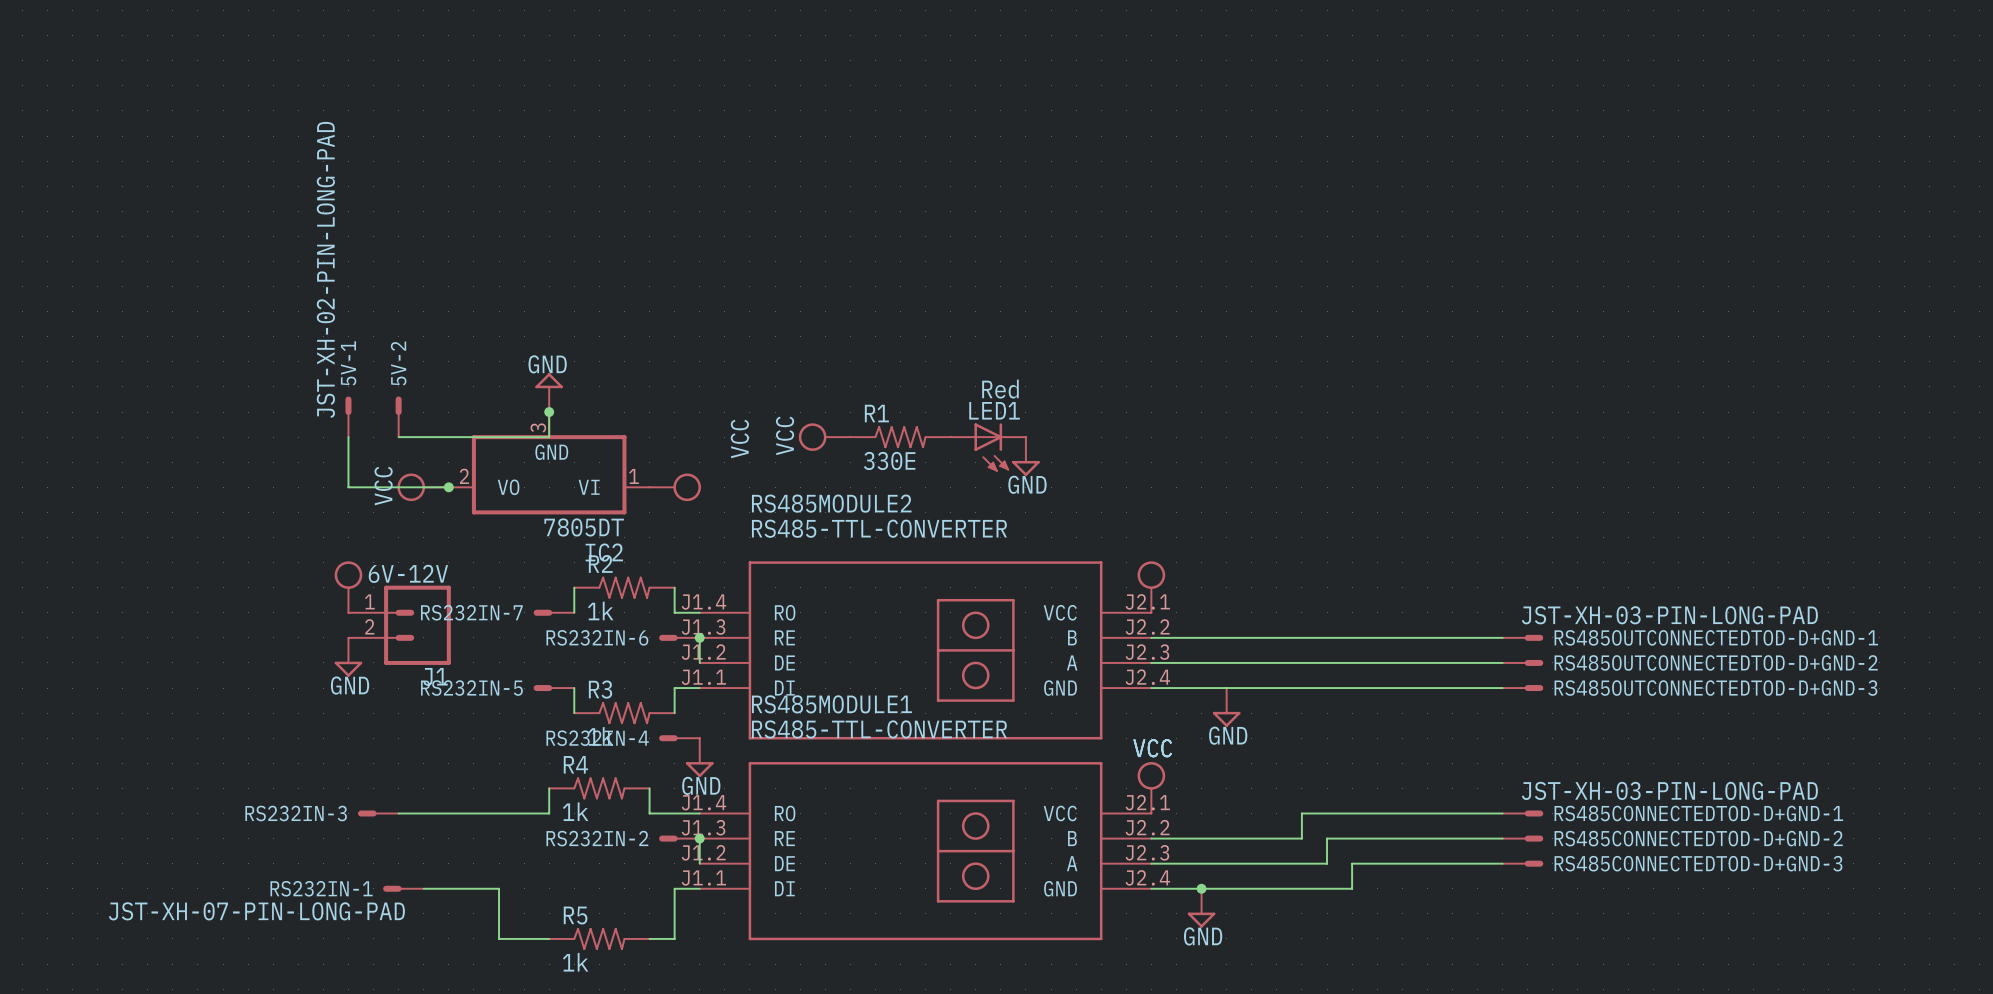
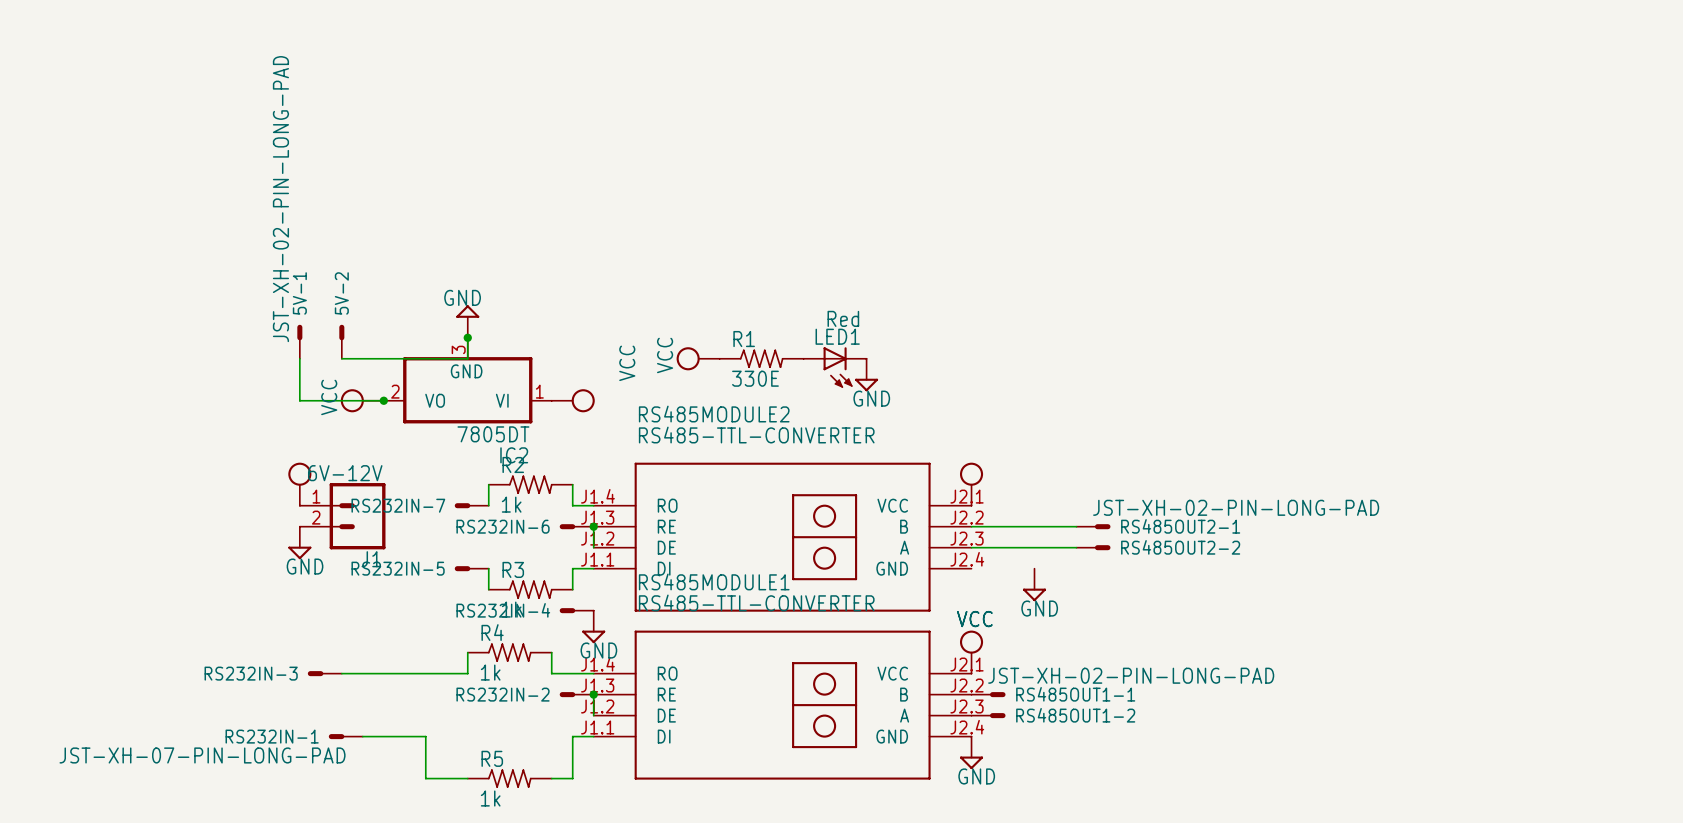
wire: (1276, 637) (1502, 637) -> none
RS485OUT2-1: none -> JST-XH-02-PIN-LONG-PAD (1093, 526)
RS485OUTCONNECTEDTOD-D+GND-1: JST-XH-03-PIN-LONG-PAD (1522, 637) -> none
wire: (1276, 662) (1502, 662) -> none
RS485OUT2-2: none -> (1093, 547)
RS485OUTCONNECTEDTOD-D+GND-2: (1522, 662) -> none
wire: (1151, 688) (1502, 688) -> none
RS485OUTCONNECTEDTOD-D+GND-3: (1522, 688) -> none
wire: (1502, 813) (1301, 813) (1301, 838) (1151, 838) -> none
RS485CONNECTEDTOD-D+GND-1: JST-XH-03-PIN-LONG-PAD (1522, 813) -> none
RS485OUT1-1: none -> JST-XH-02-PIN-LONG-PAD (988, 694)
wire: (1502, 838) (1327, 838) (1327, 863) (1151, 863) -> none
RS485CONNECTEDTOD-D+GND-2: (1522, 838) -> none
RS485OUT1-2: none -> (988, 715)
wire: (1502, 863) (1352, 863) (1352, 888) (1151, 888) -> none
RS485CONNECTEDTOD-D+GND-3: (1522, 863) -> none
junction: (1201, 888) -> none
power symbol position: GND (1201, 908) -> GND (971, 752)

